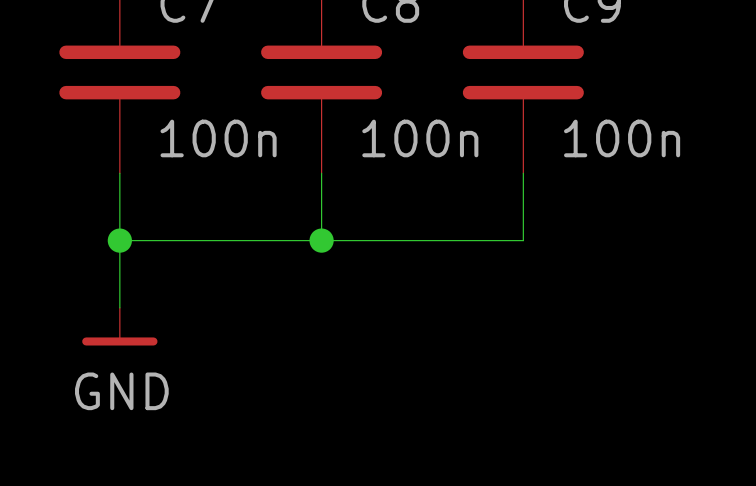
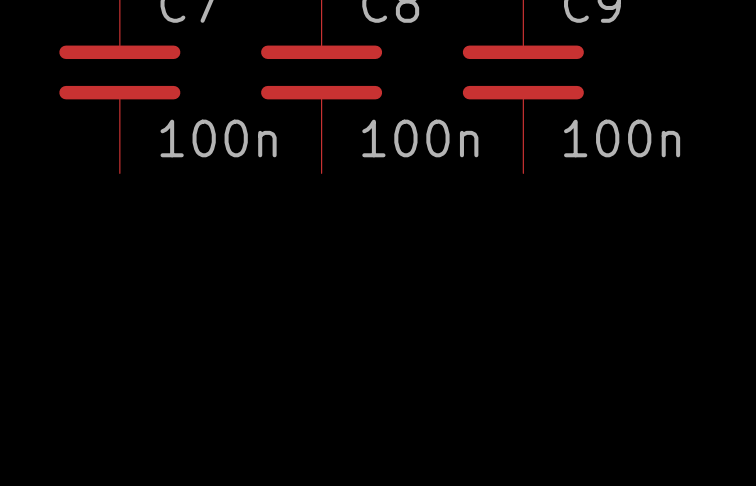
wire: (119, 173) (119, 307) -> none
wire: (321, 173) (321, 240) -> none
wire: (523, 173) (523, 240) (119, 240) -> none
junction: (119, 240) -> none
junction: (321, 240) -> none
power symbol: GND (119, 326) -> none

